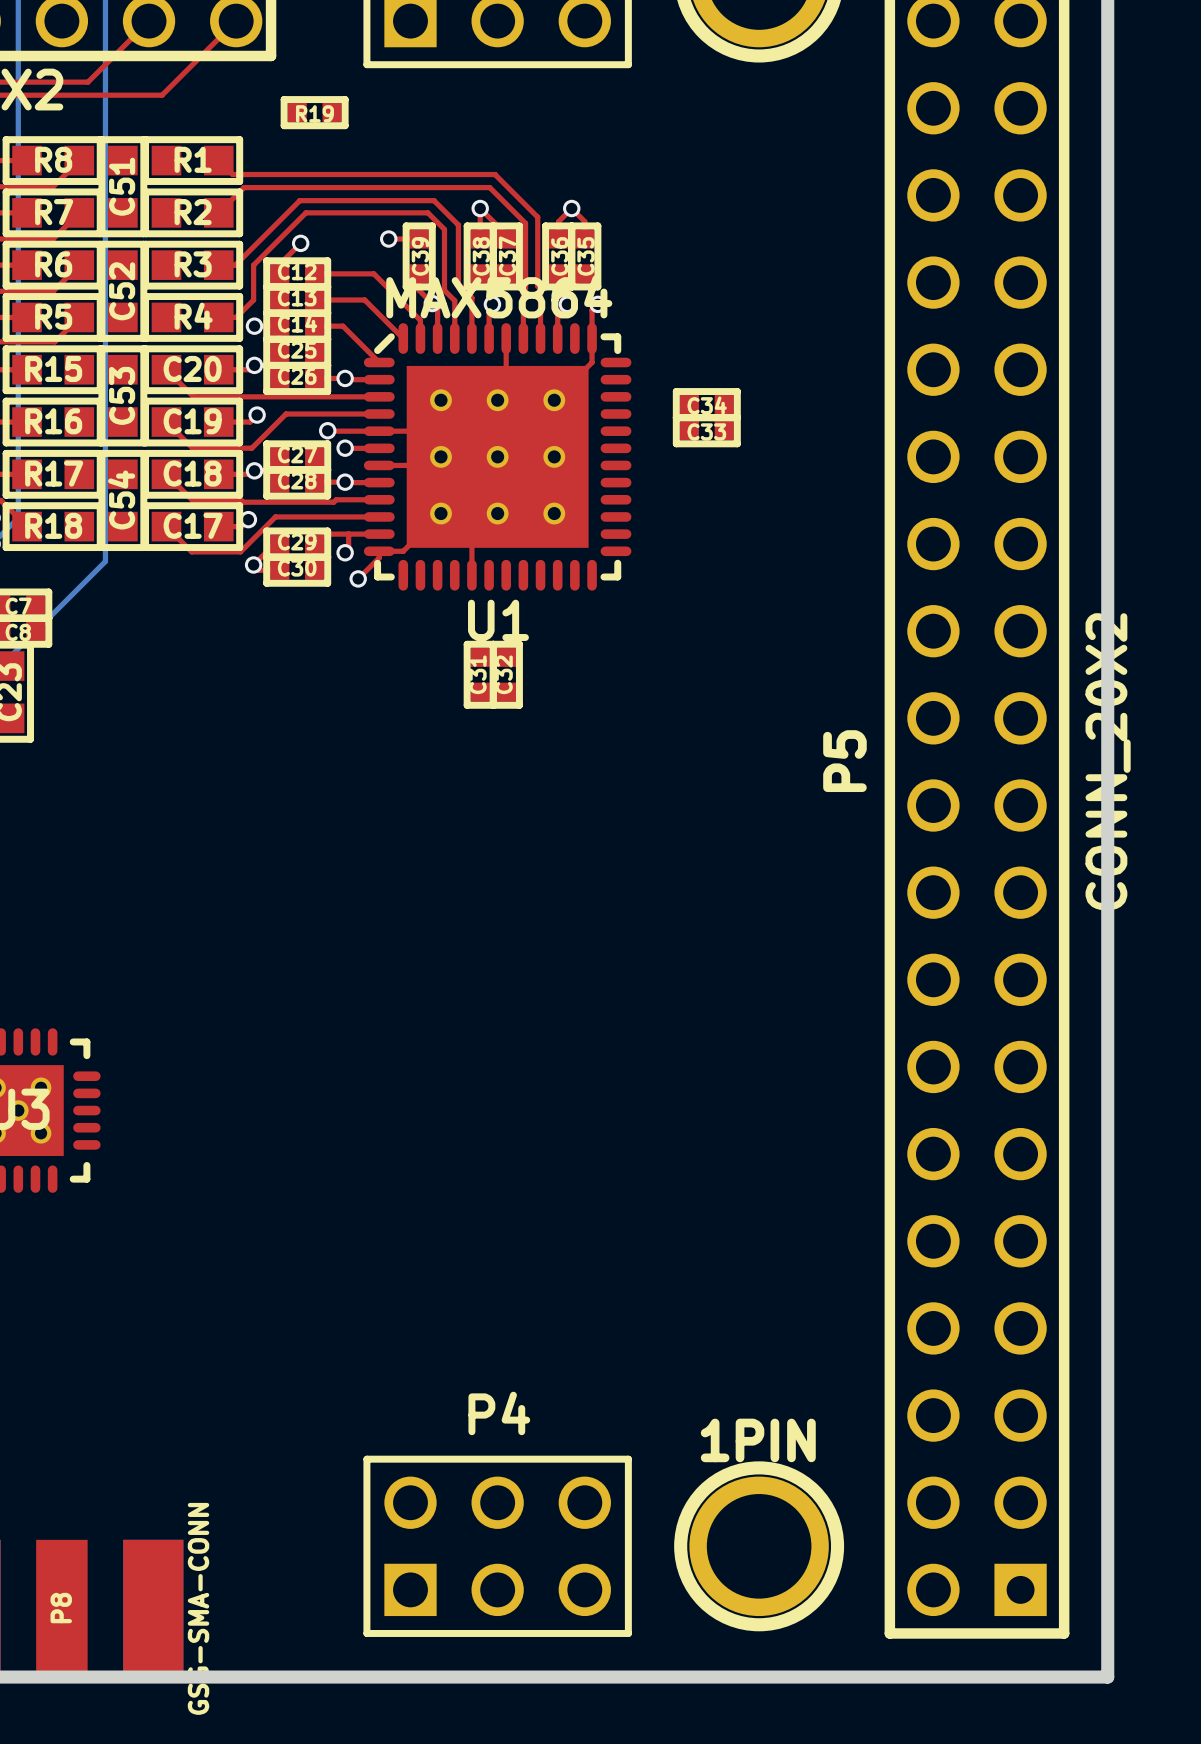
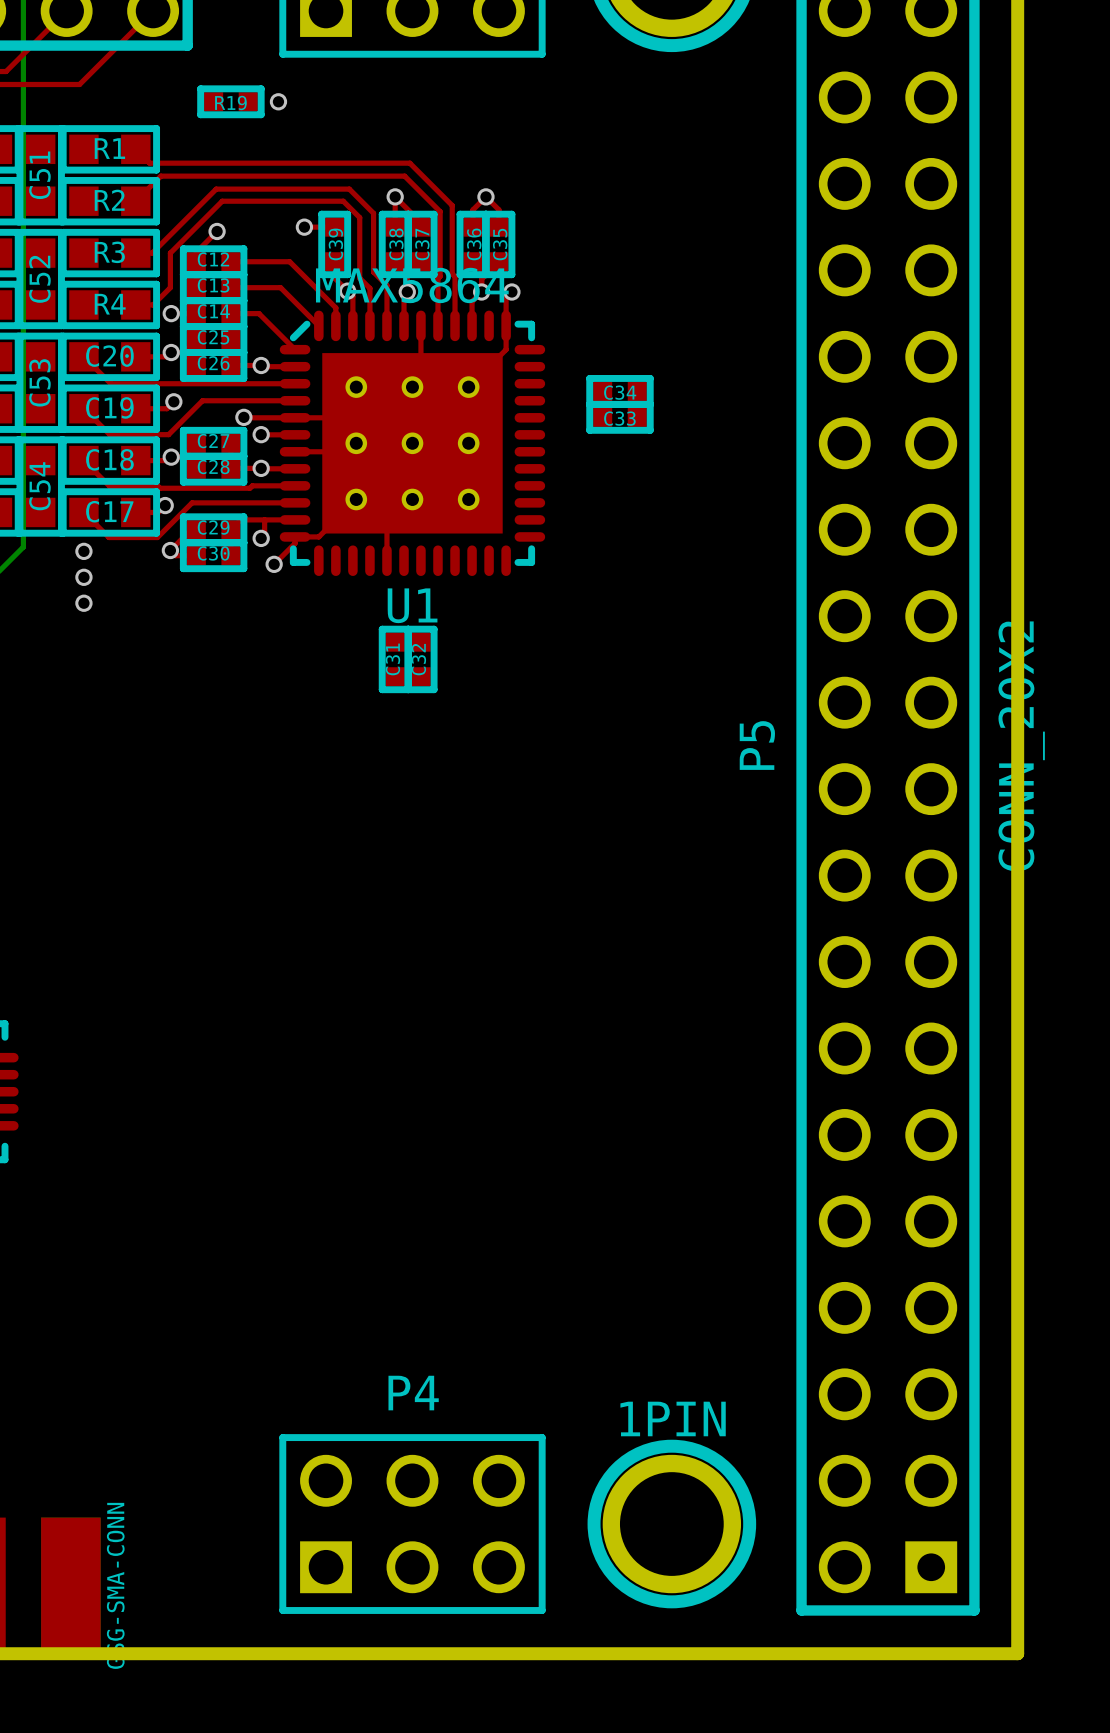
via: none -> (278, 101)
via: none -> (83, 551)
via: none -> (83, 577)
via: none -> (83, 603)

